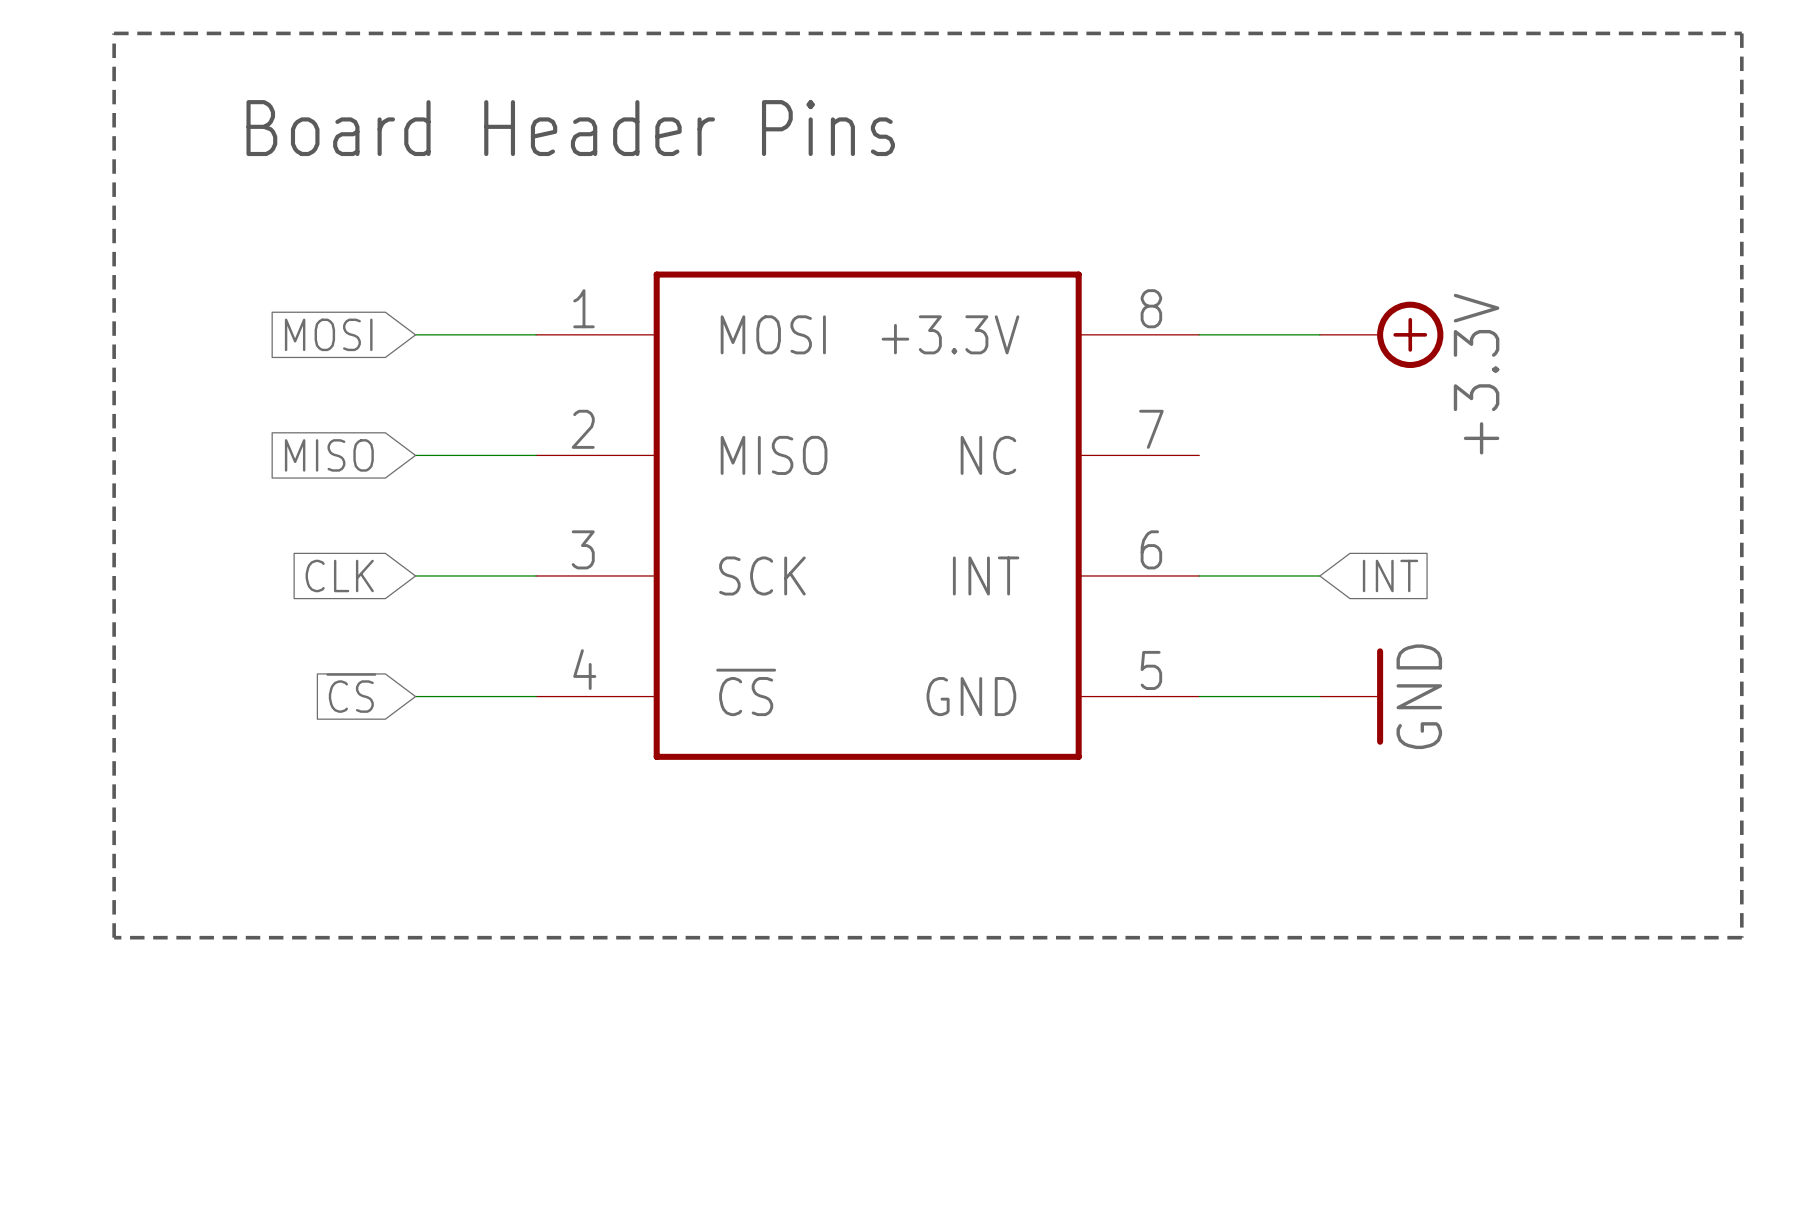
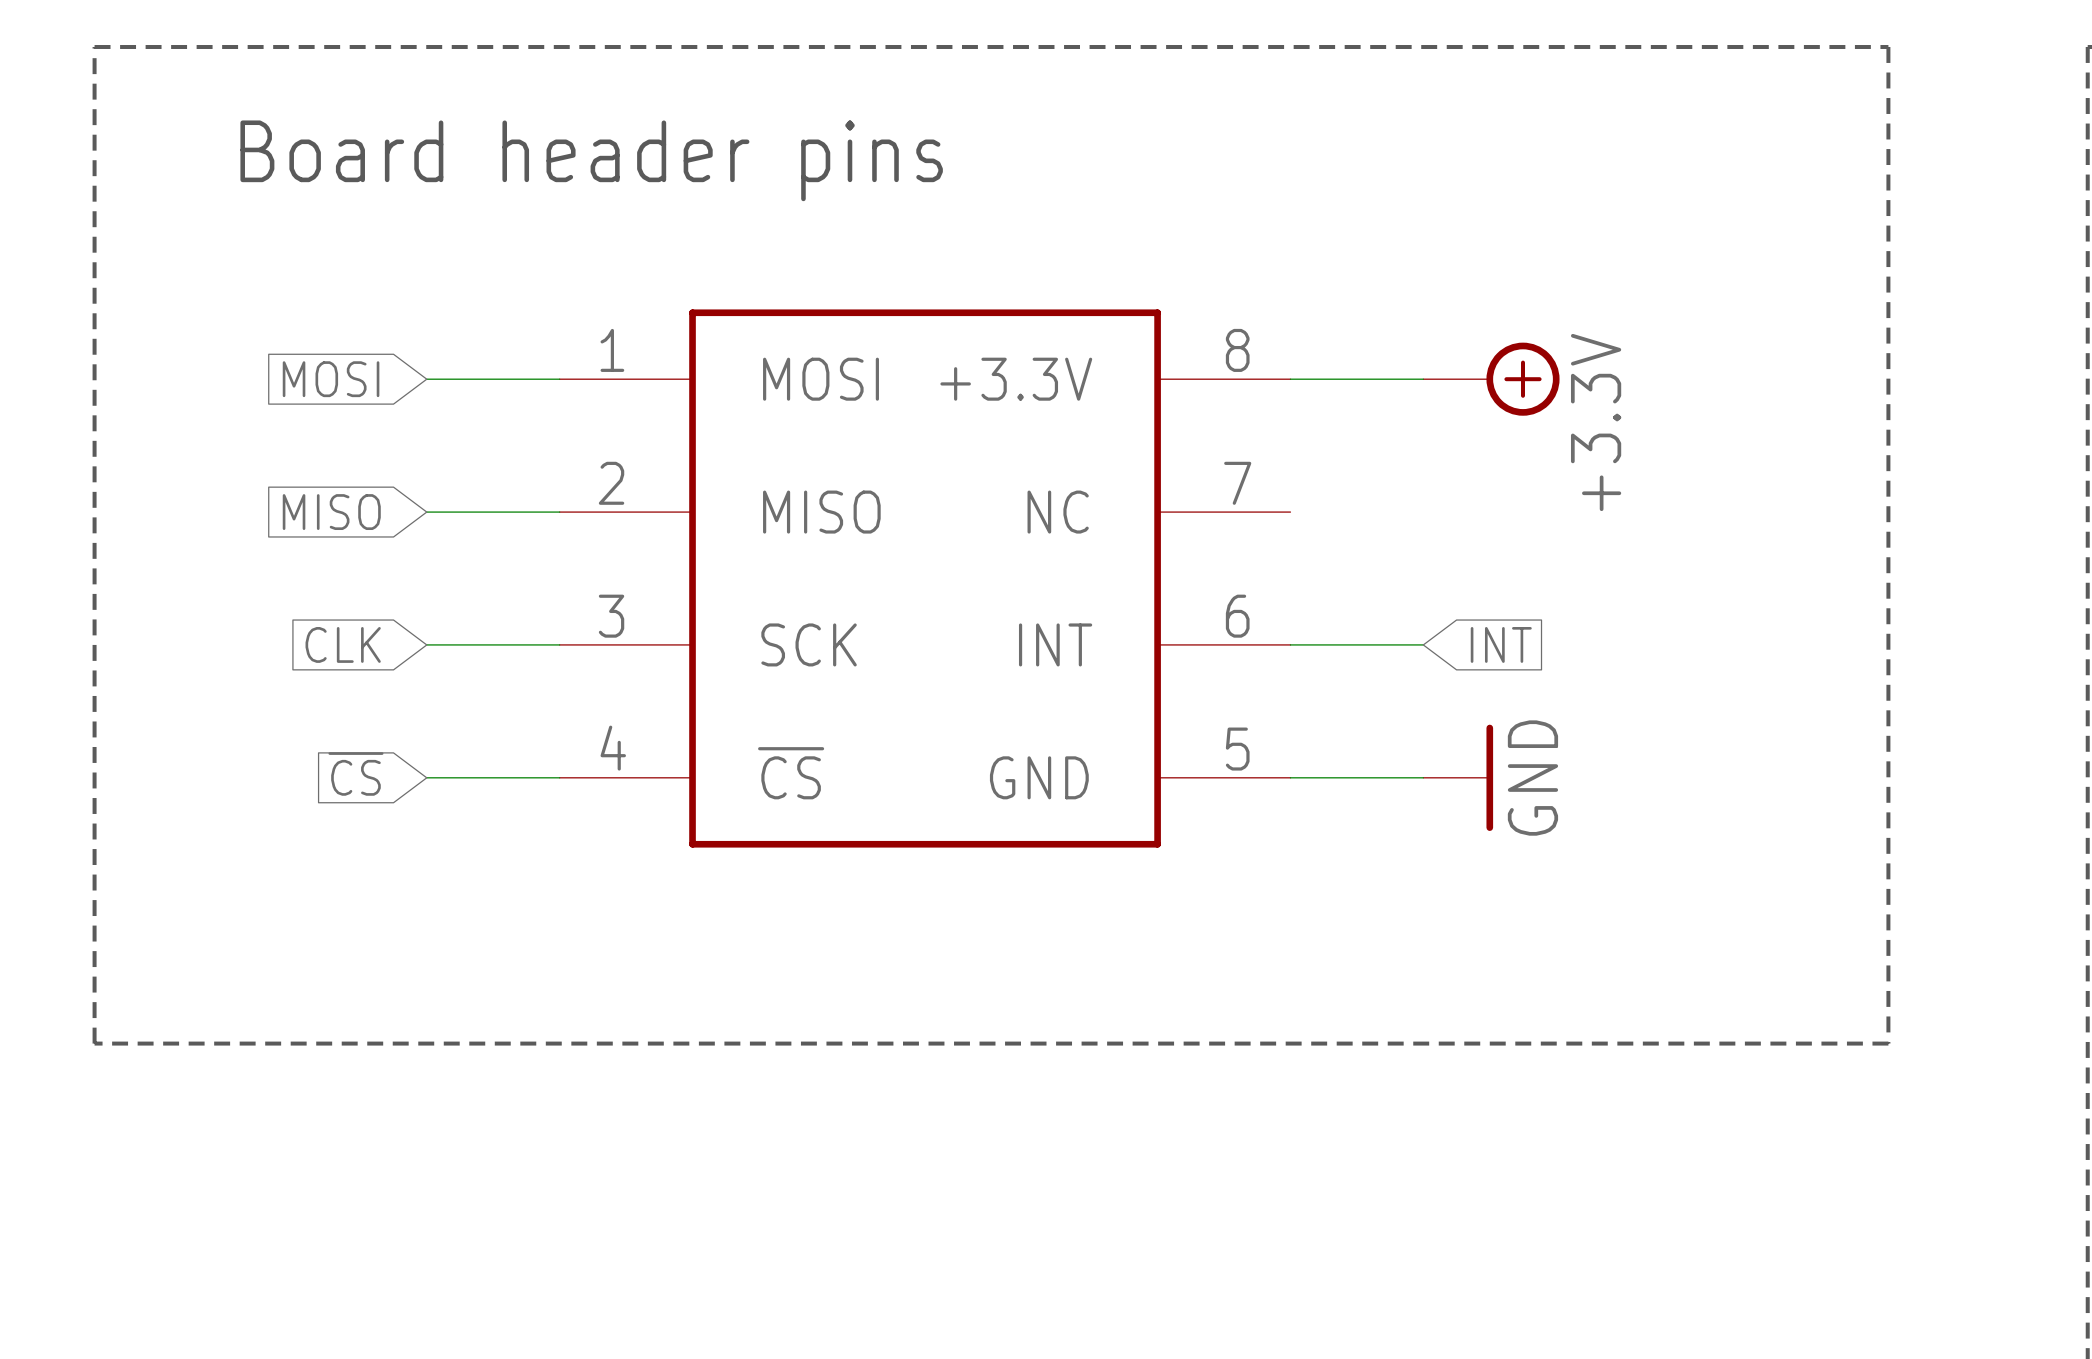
text: Board Header Pins (570, 128) -> Board header pins (591, 160)

